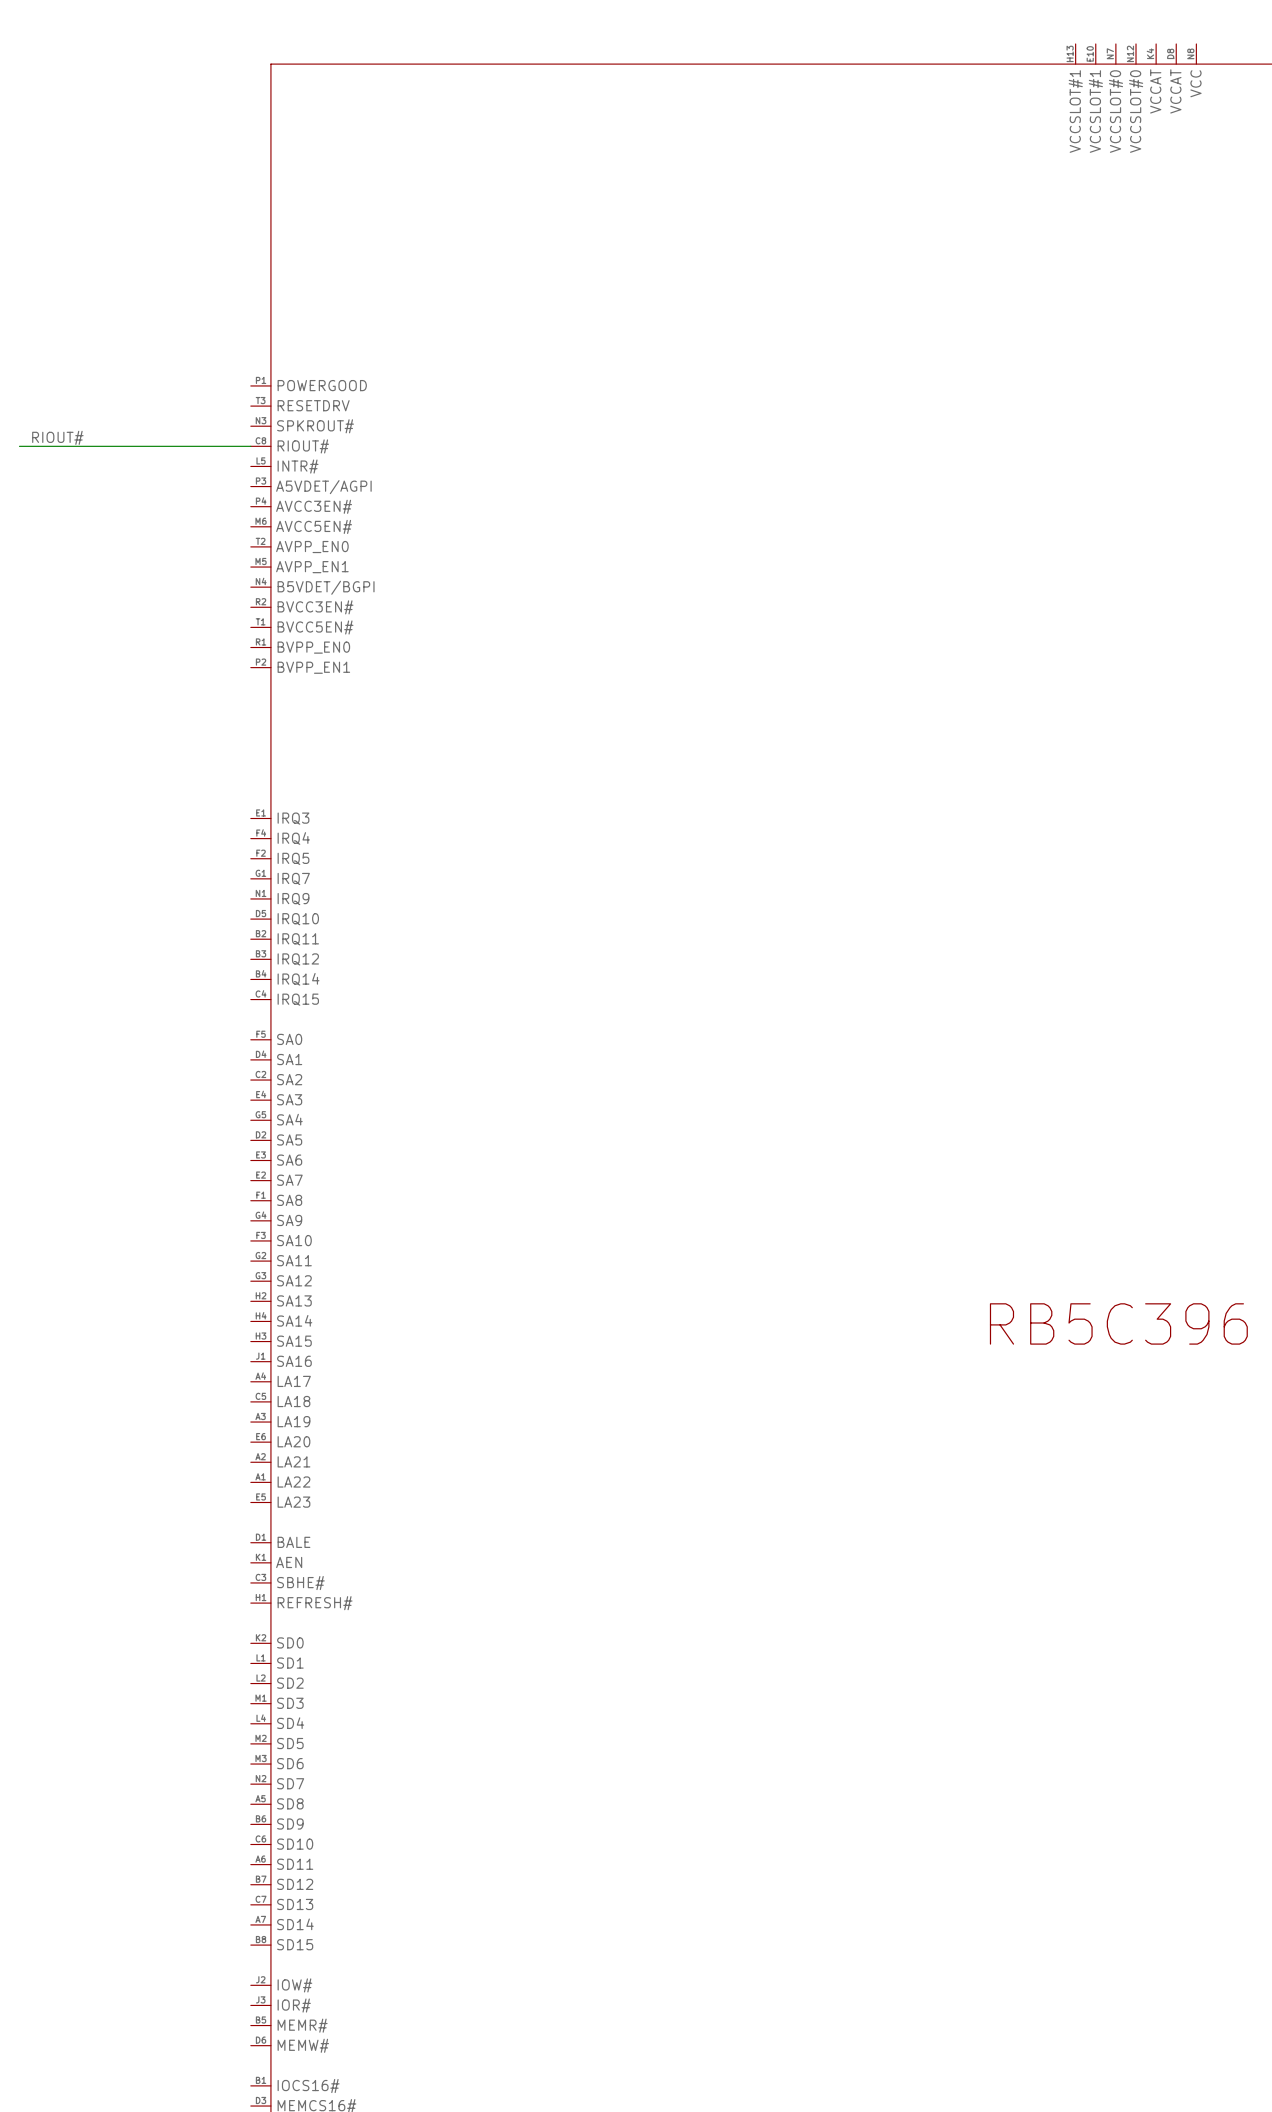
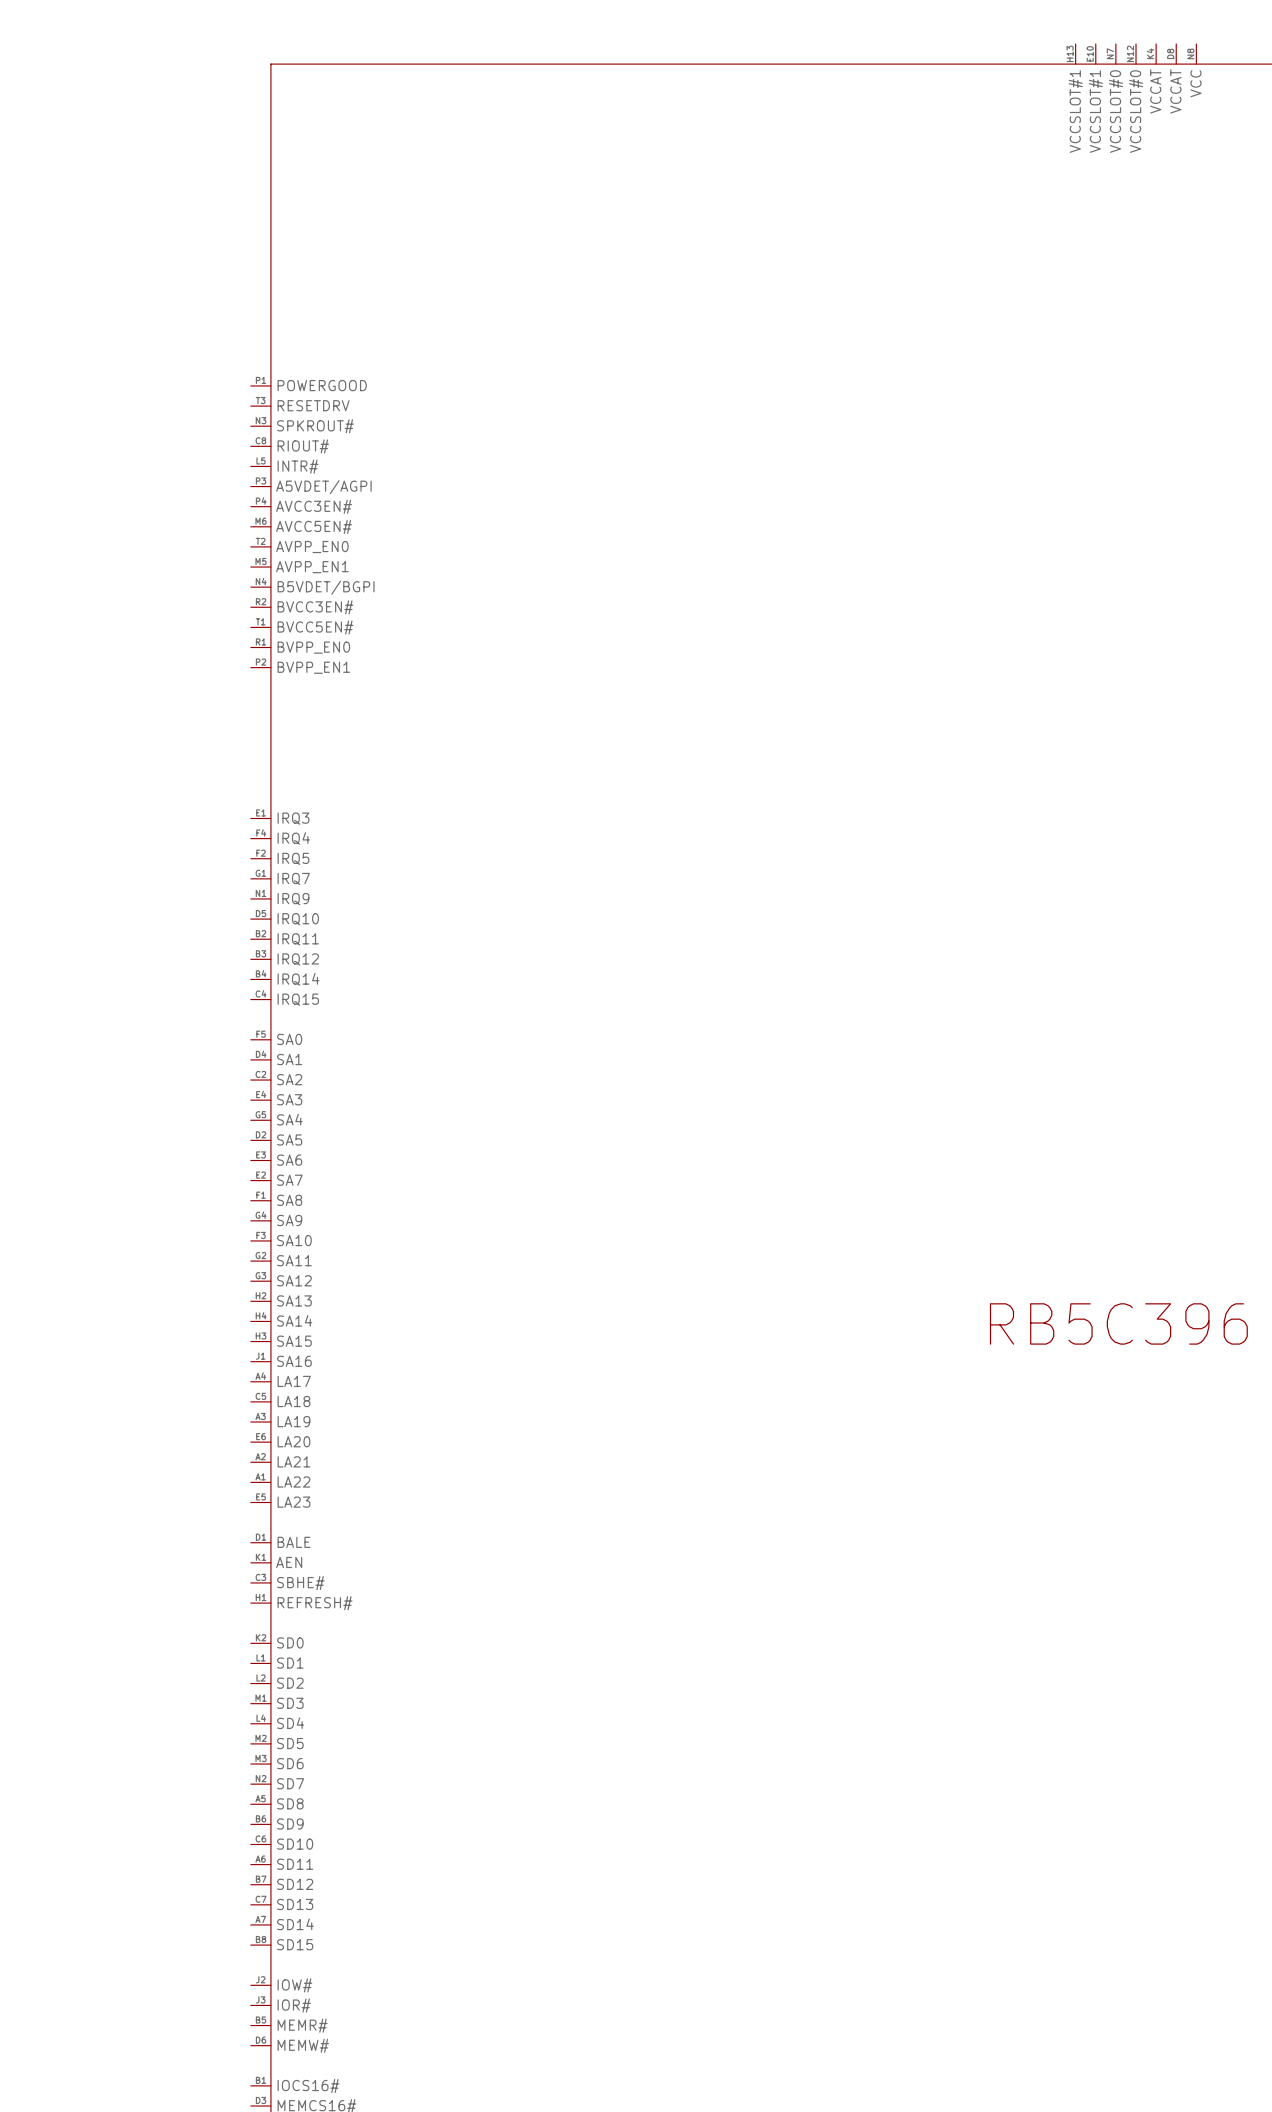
label: RIOUT# (57, 437) -> none
wire: (19, 446) (250, 446) -> none

